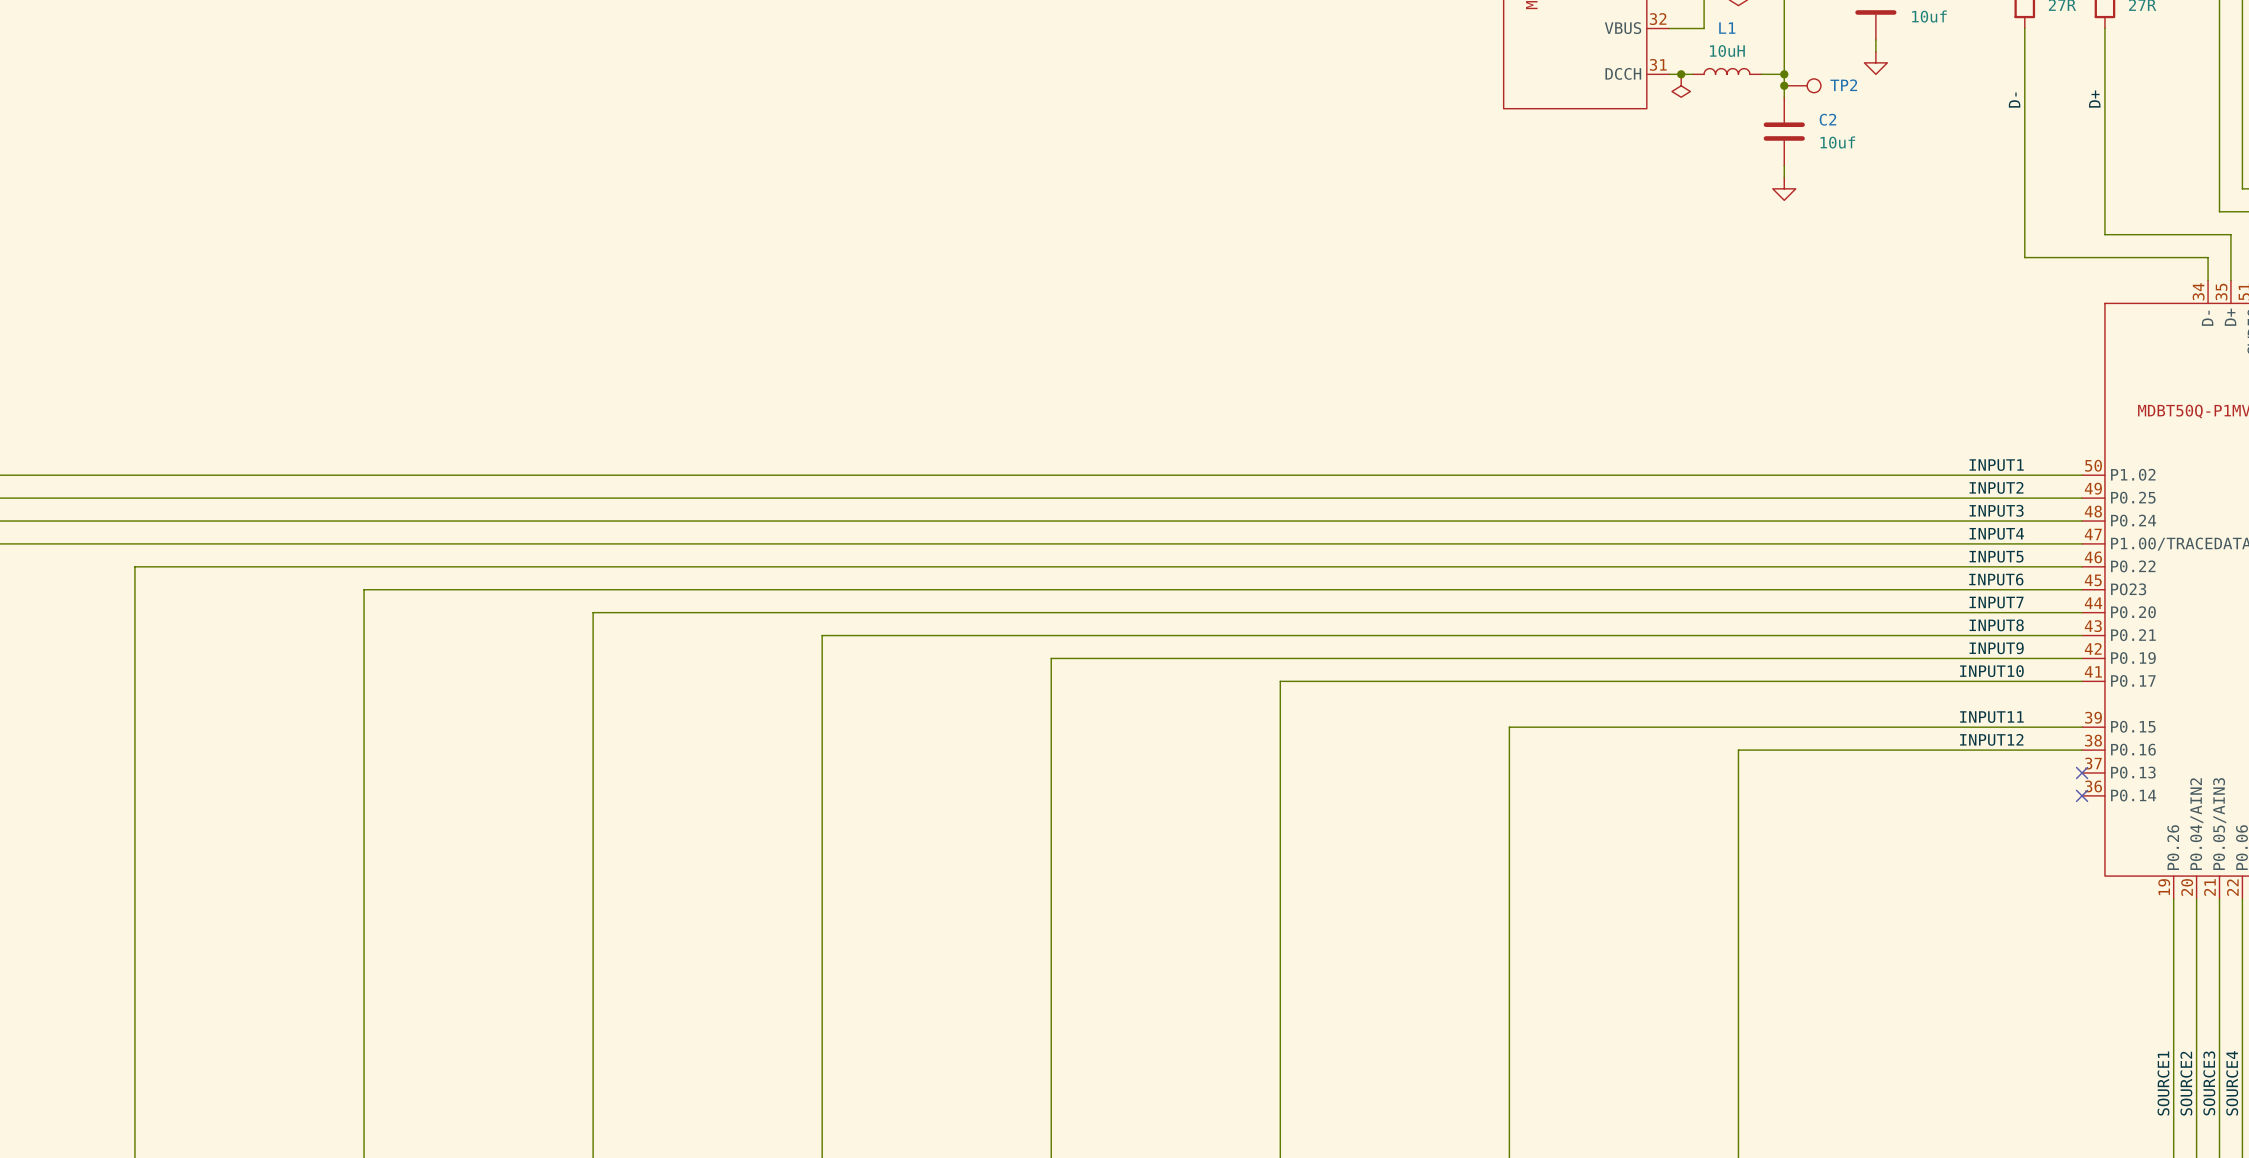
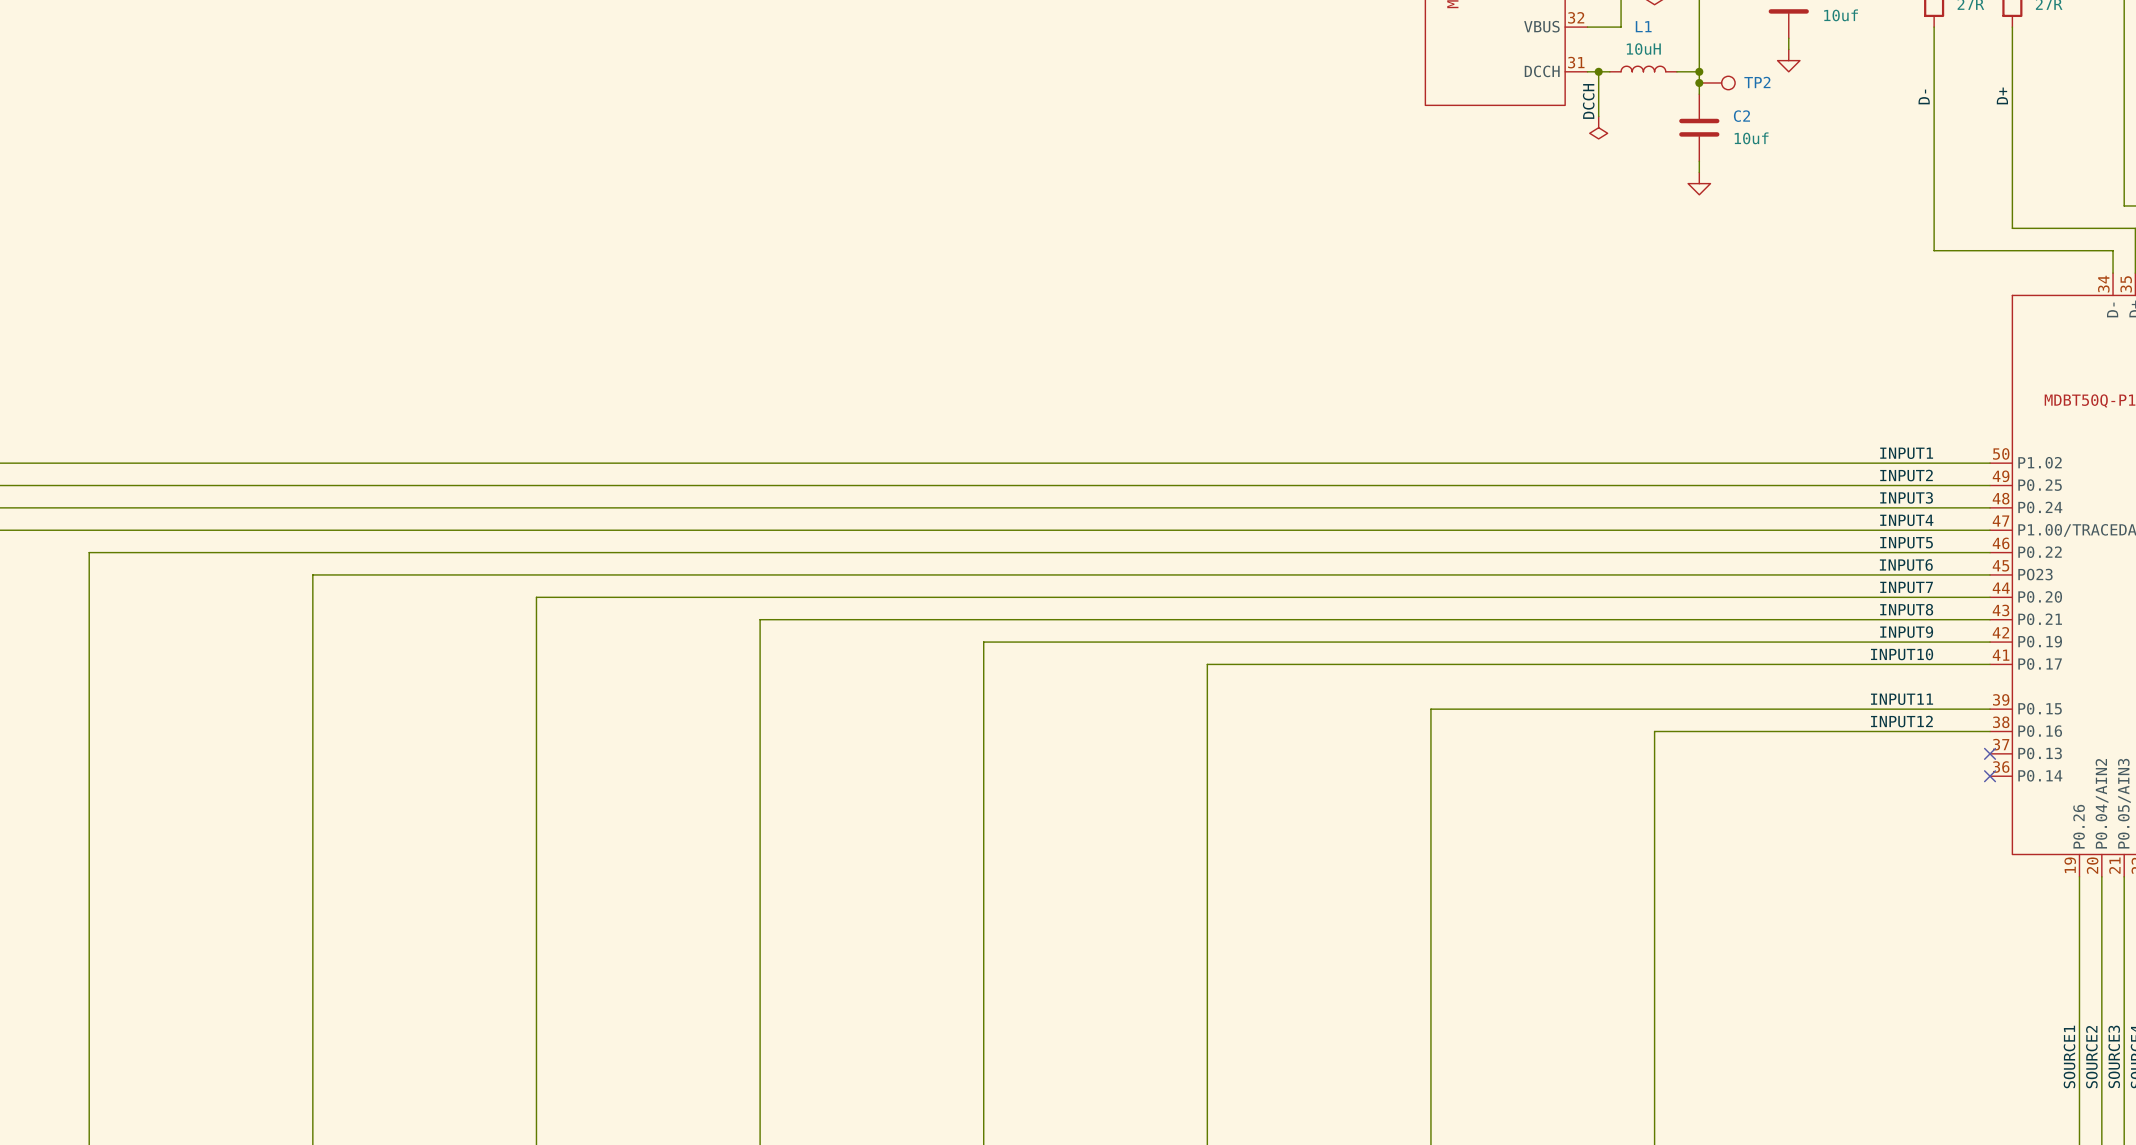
wire: none -> (1598, 71) (1598, 116)
power symbol position: (1681, 85) -> (1598, 127)
label: none -> DCCH (1588, 101)

